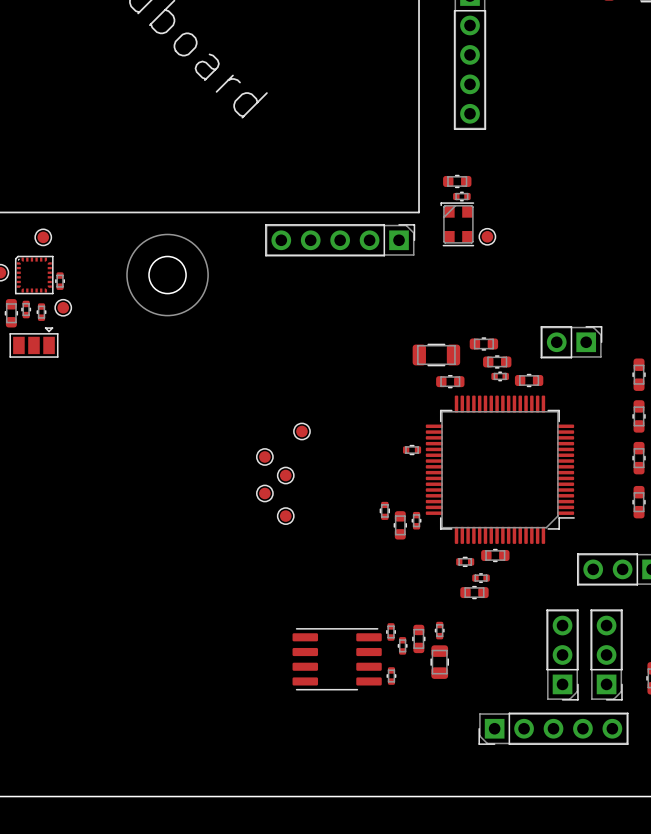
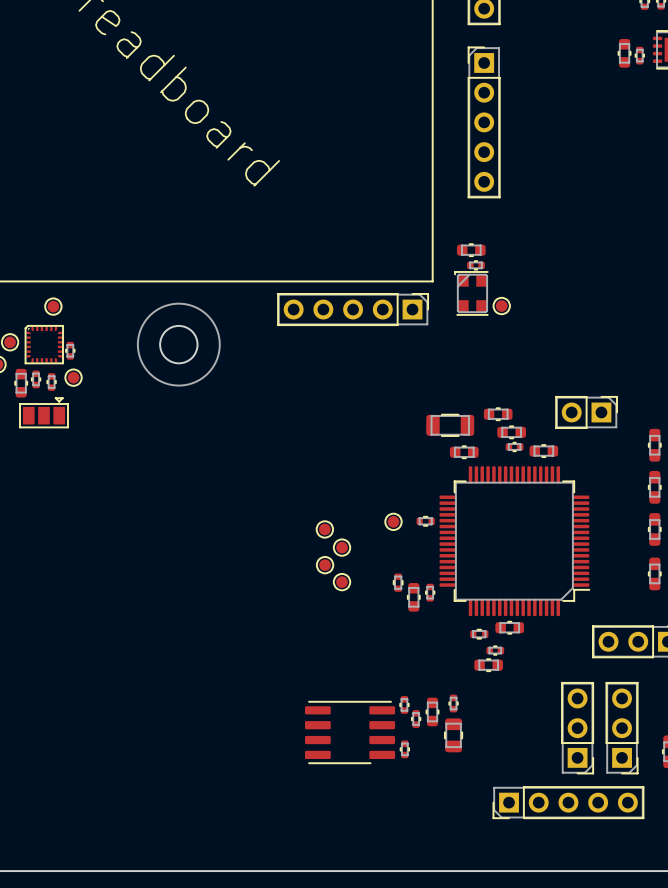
part: (301, 431) -> none
part: none -> (393, 521)
part: (264, 456) -> none
part: none -> (324, 529)
part: (285, 475) -> none
part: none -> (342, 547)
part: (264, 493) -> none
part: none -> (325, 565)
part: none -> (342, 582)
part: (285, 516) -> none

